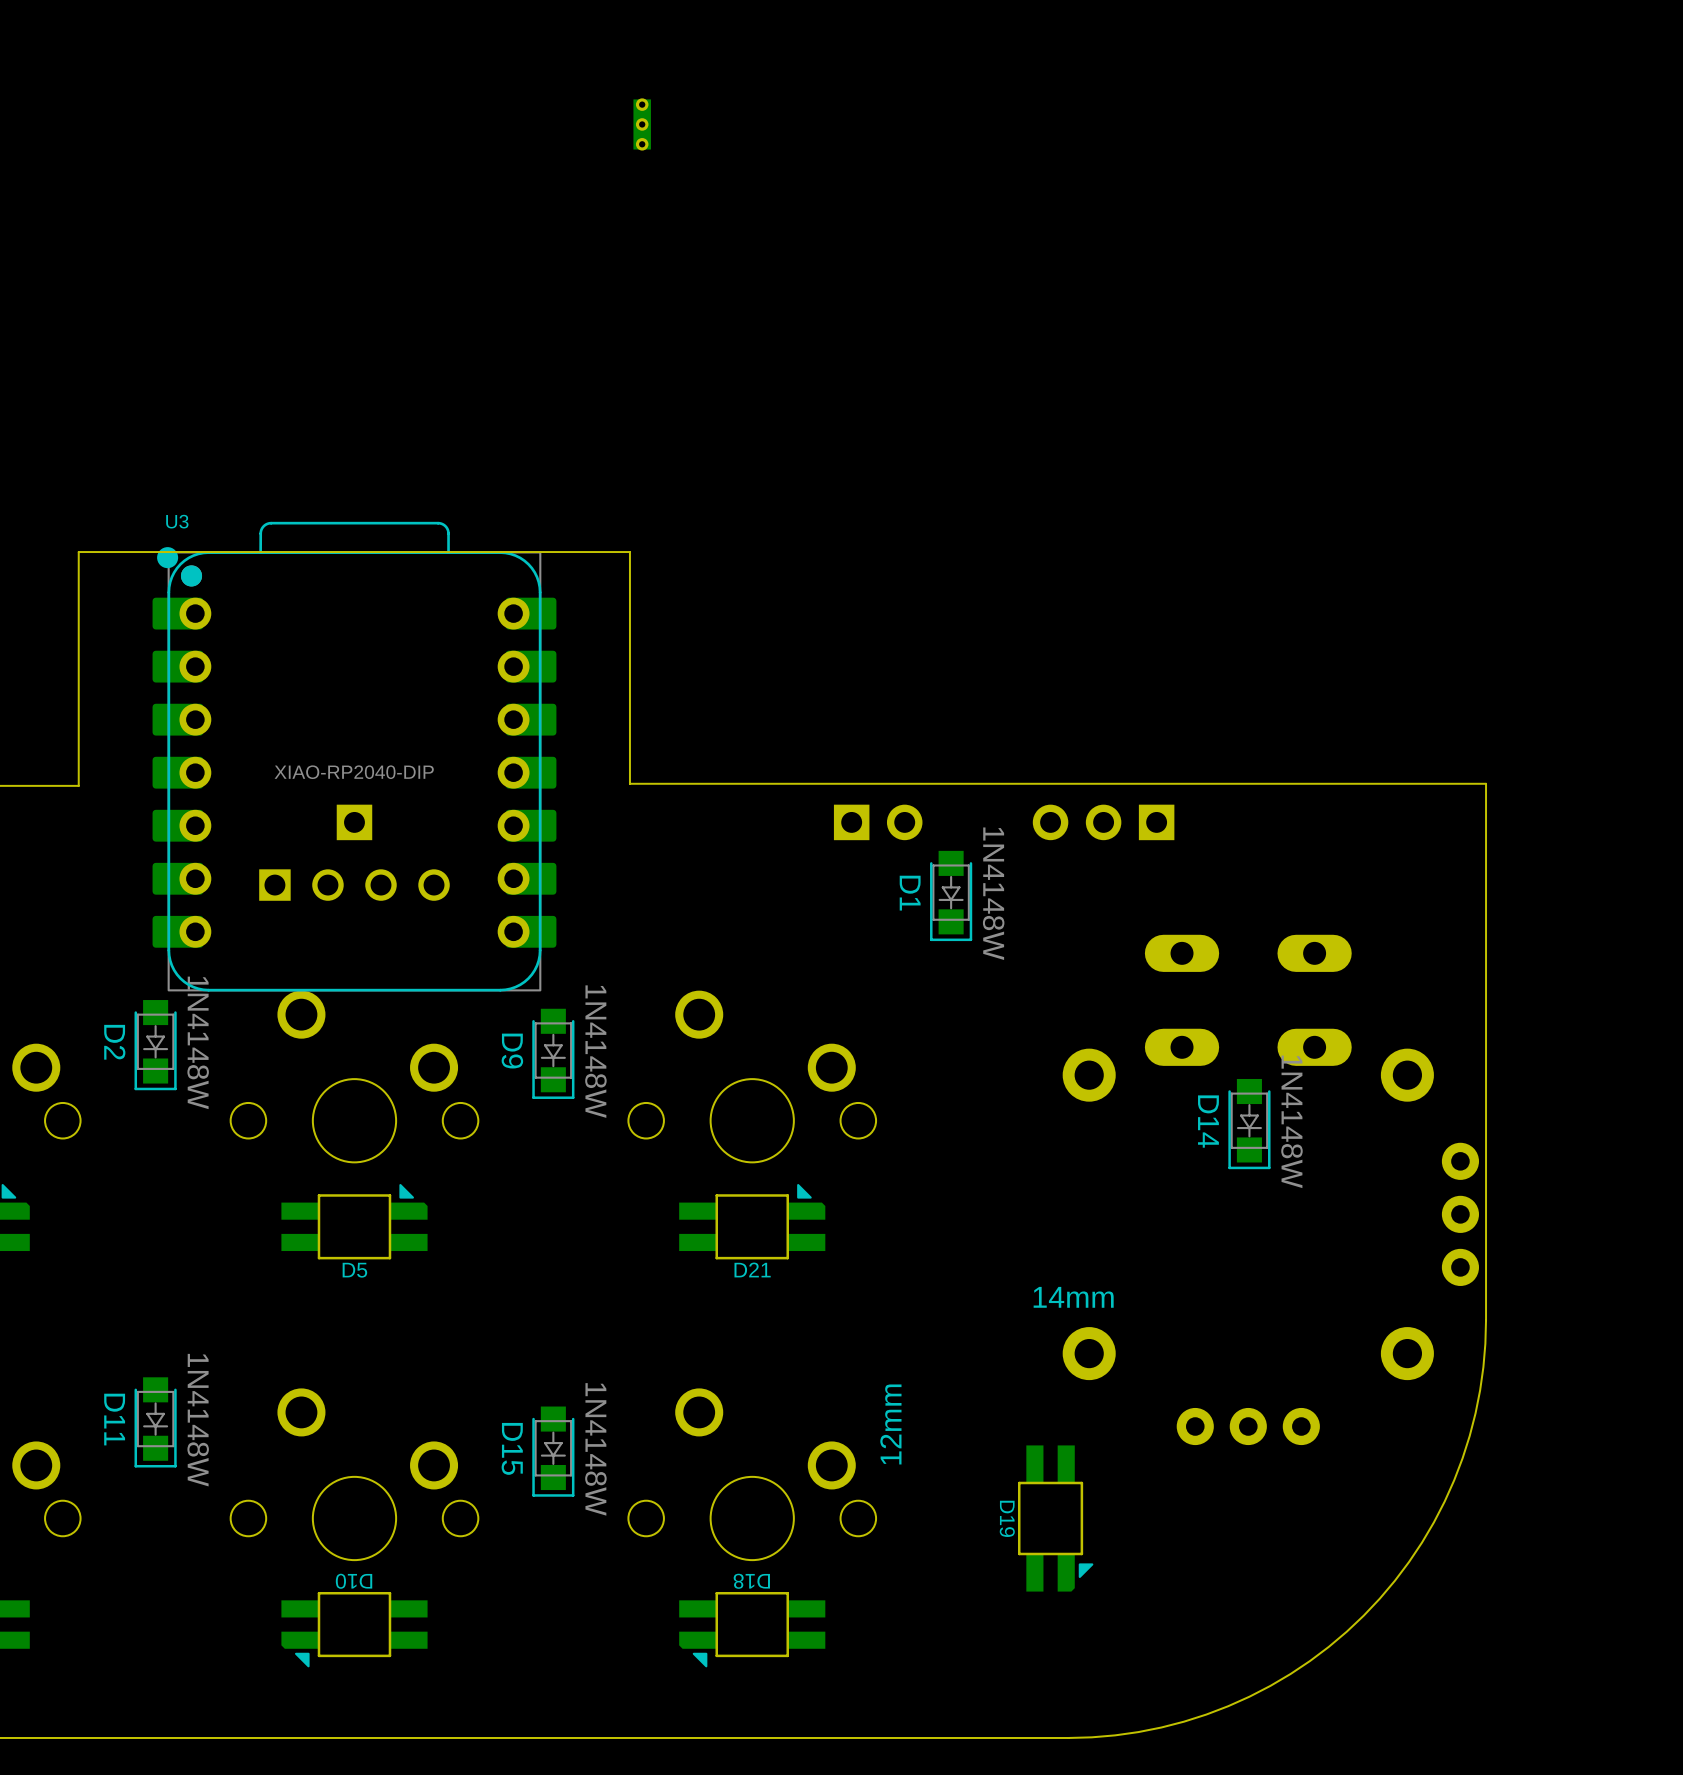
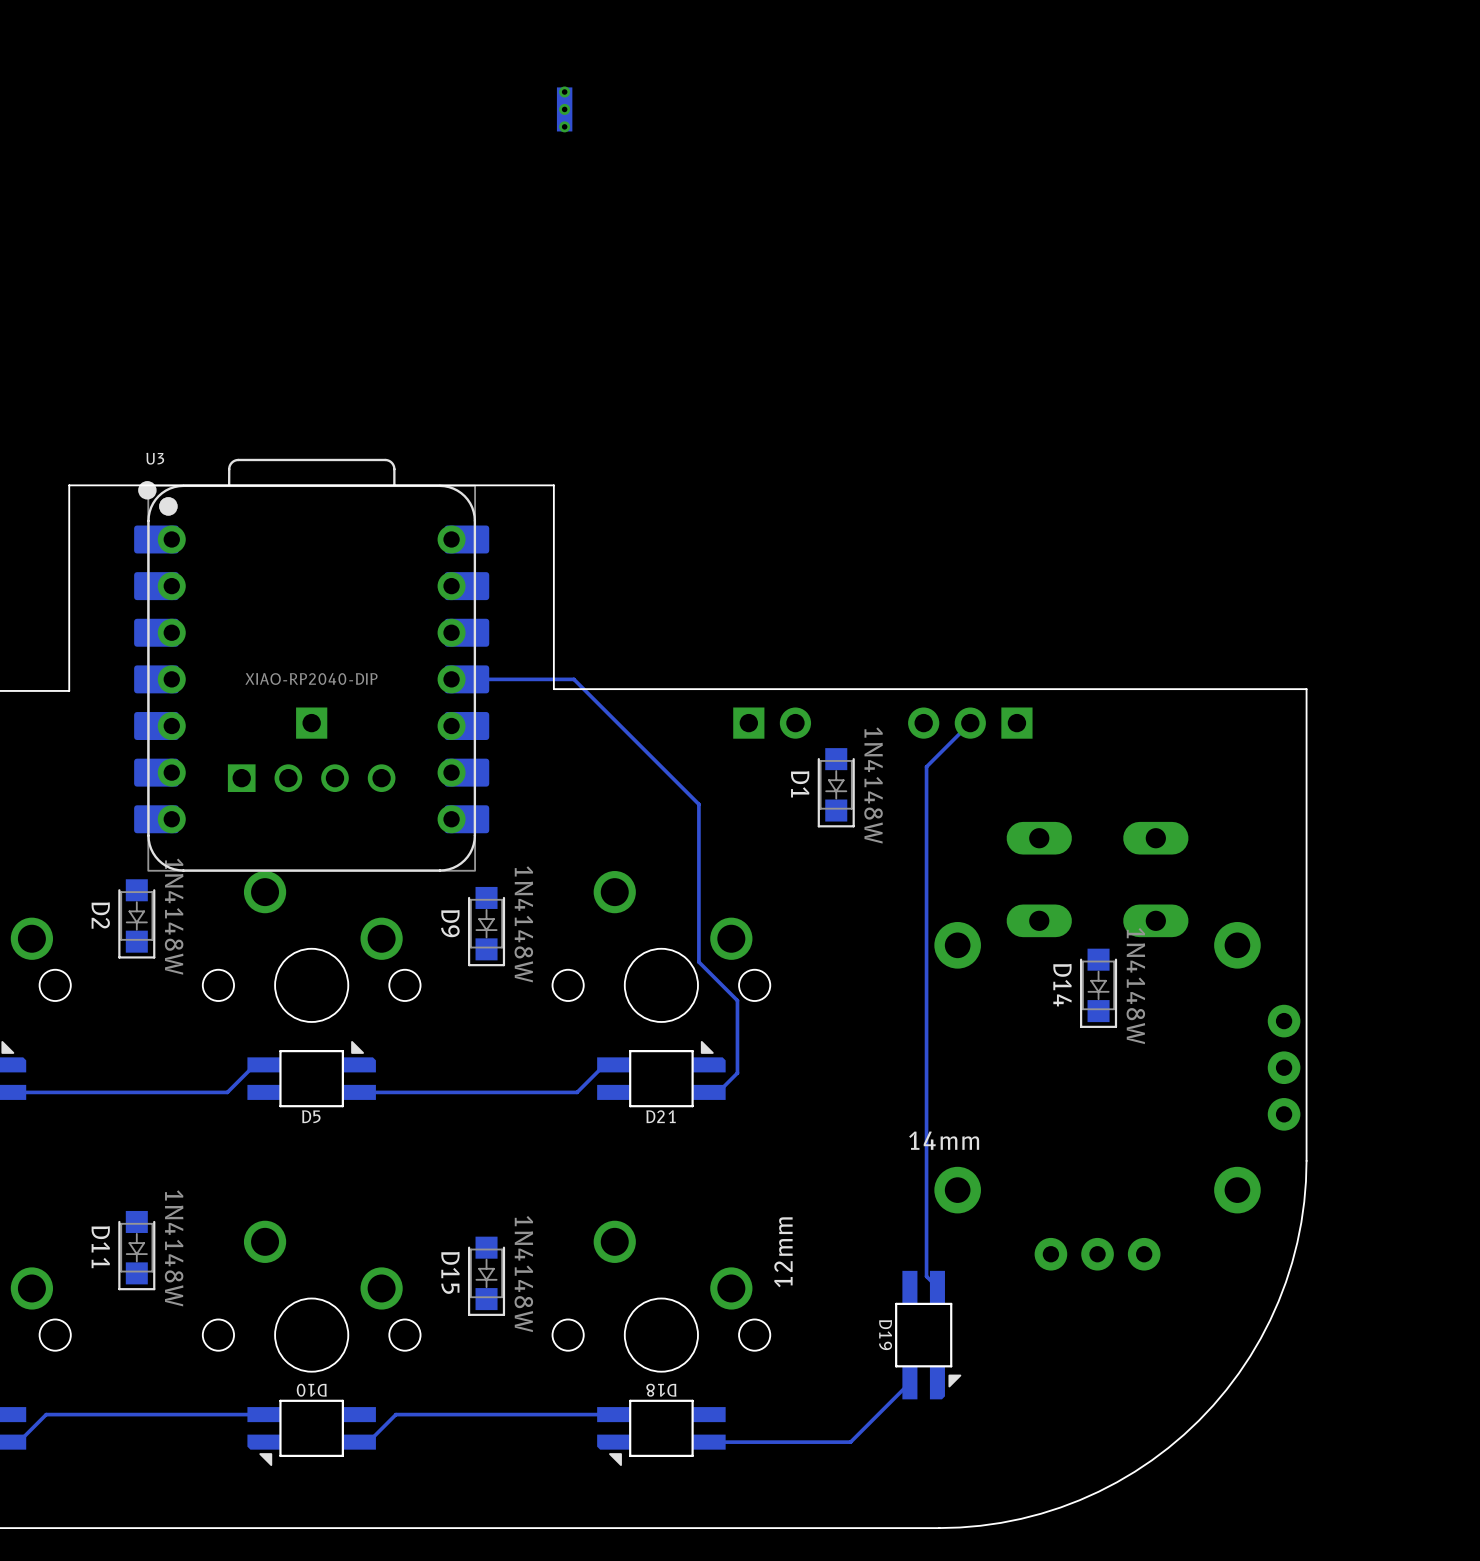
track: none -> (466, 679) (573, 679) (698, 804) (698, 962) (737, 1000) (737, 1073) (718, 1092) (709, 1092)
track: none -> (970, 723) (926, 766) (926, 1276) (937, 1287)
track: none -> (263, 1064) (254, 1064) (227, 1092) (9, 1092)
track: none -> (613, 1064) (604, 1064) (577, 1092) (359, 1092)
track: none -> (909, 1382) (850, 1442) (709, 1442)
track: none -> (263, 1414) (46, 1414) (18, 1442) (9, 1442)
track: none -> (613, 1414) (395, 1414) (368, 1442) (359, 1442)

